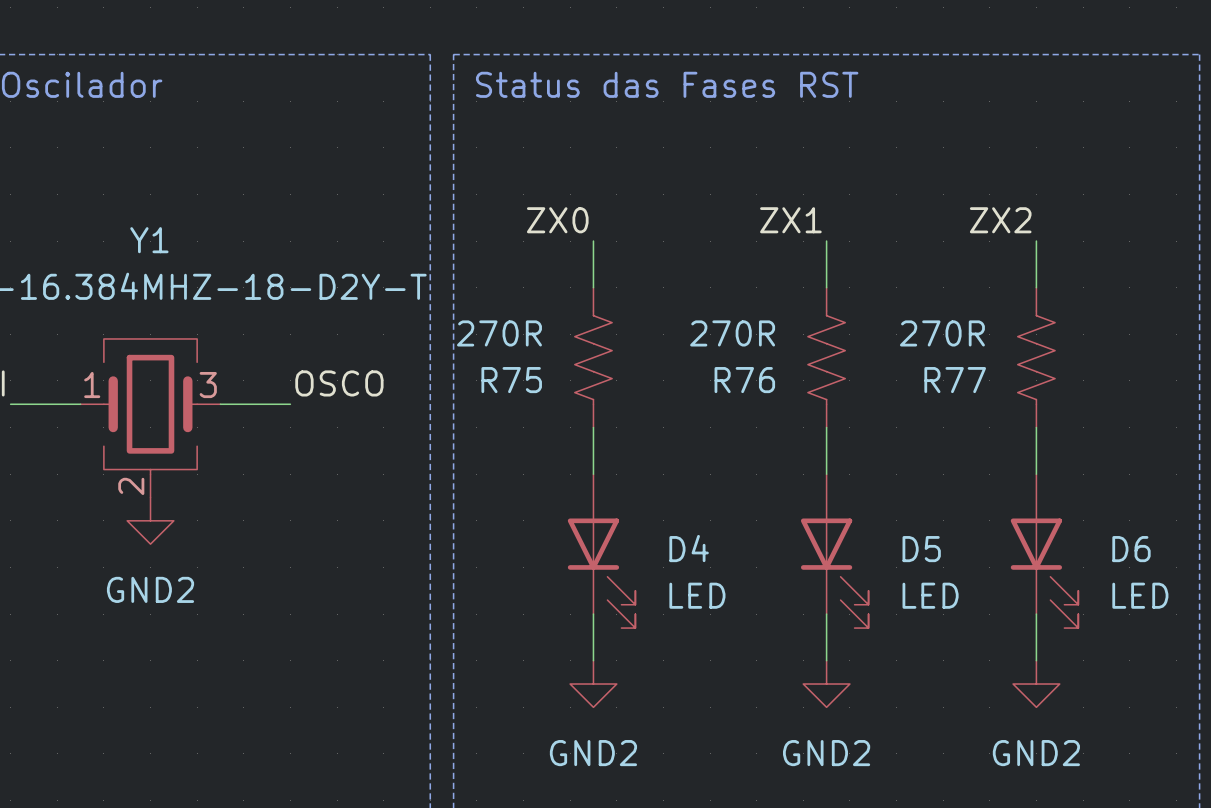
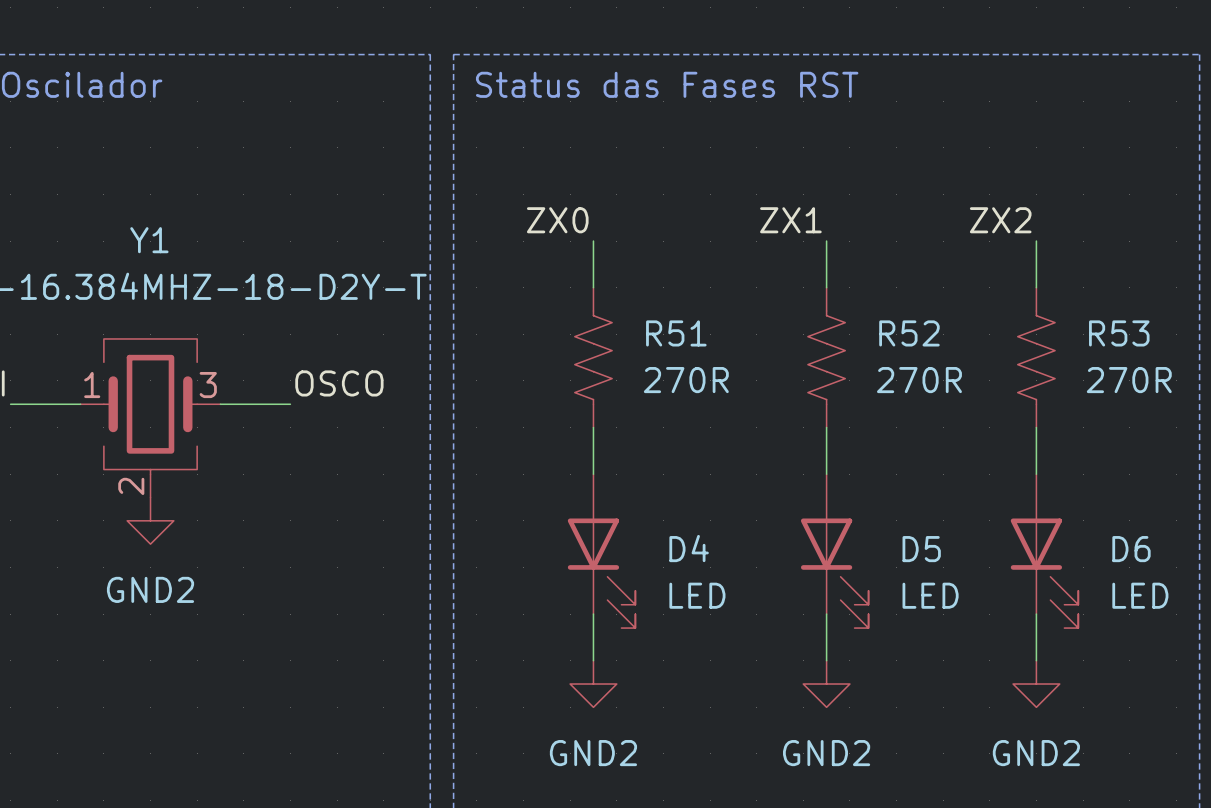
R75 value position: 270R (499, 333) -> 270R (686, 380)
R76 value position: 270R (732, 333) -> 270R (919, 380)
R77 value position: 270R (942, 333) -> 270R (1129, 380)
R75 name: R75 (511, 380) -> R51 (676, 333)
R76 name: R76 (744, 380) -> R52 (909, 333)
R77 name: R77 (955, 380) -> R53 (1119, 333)

